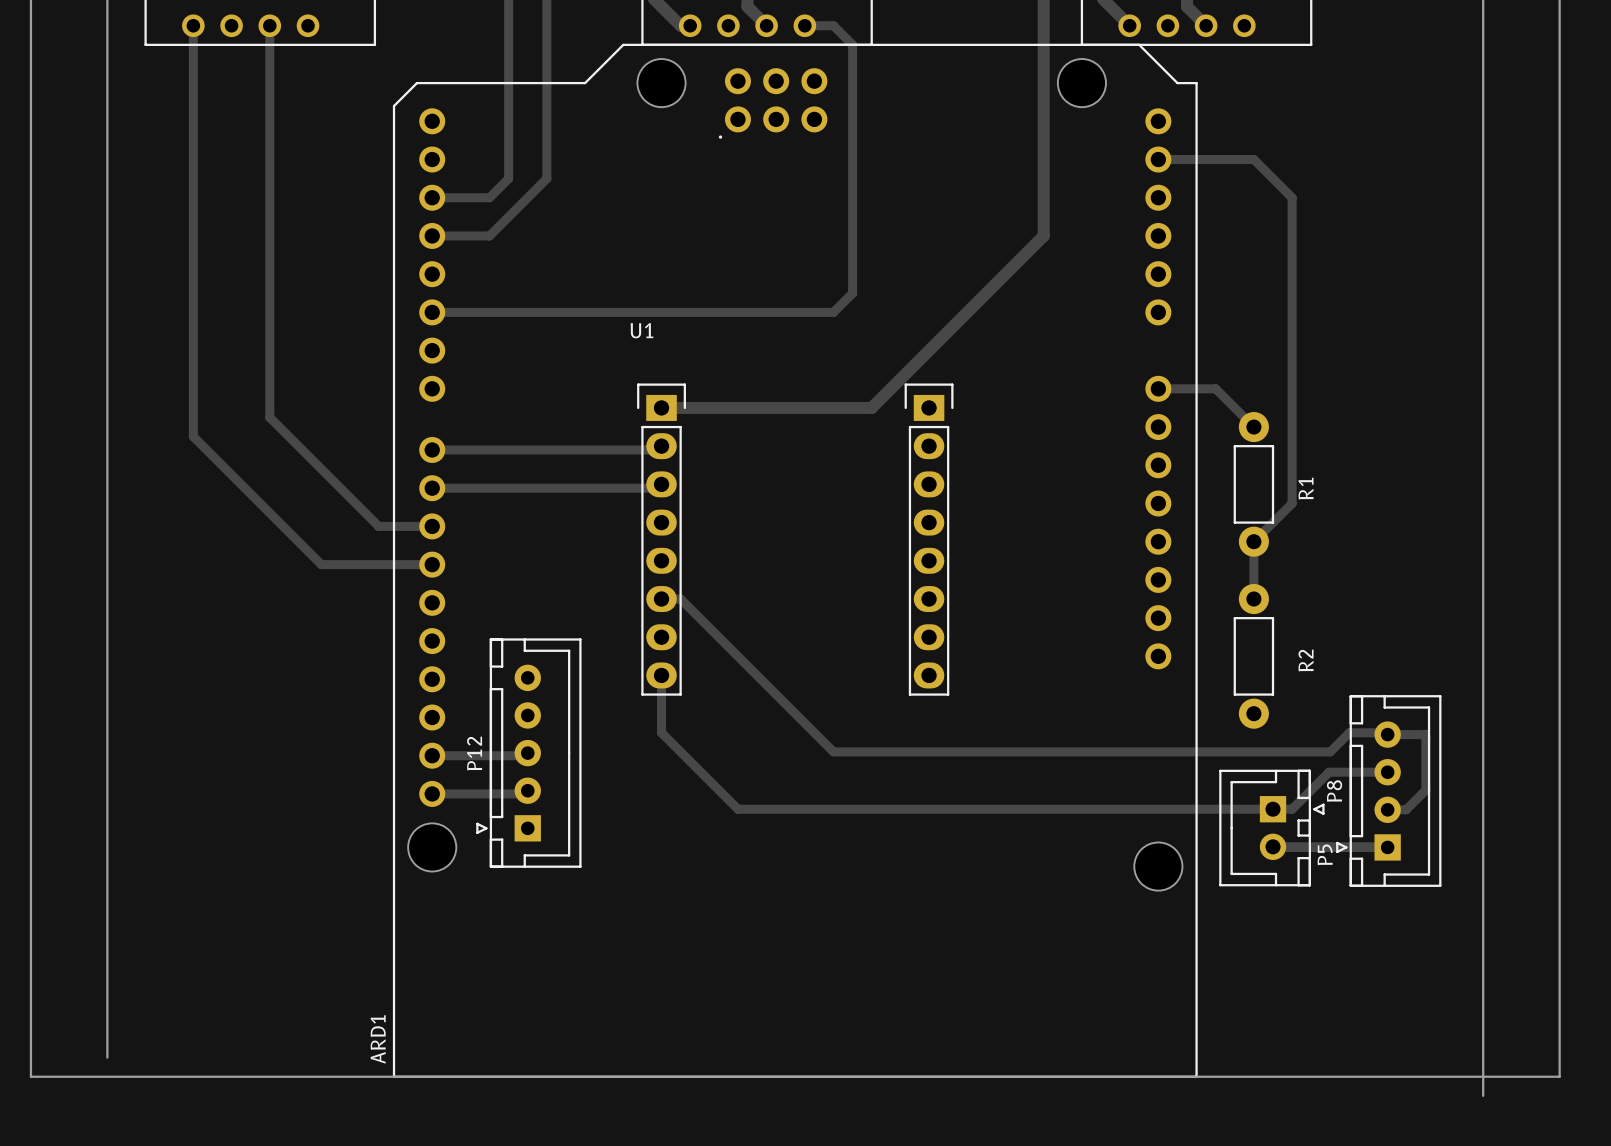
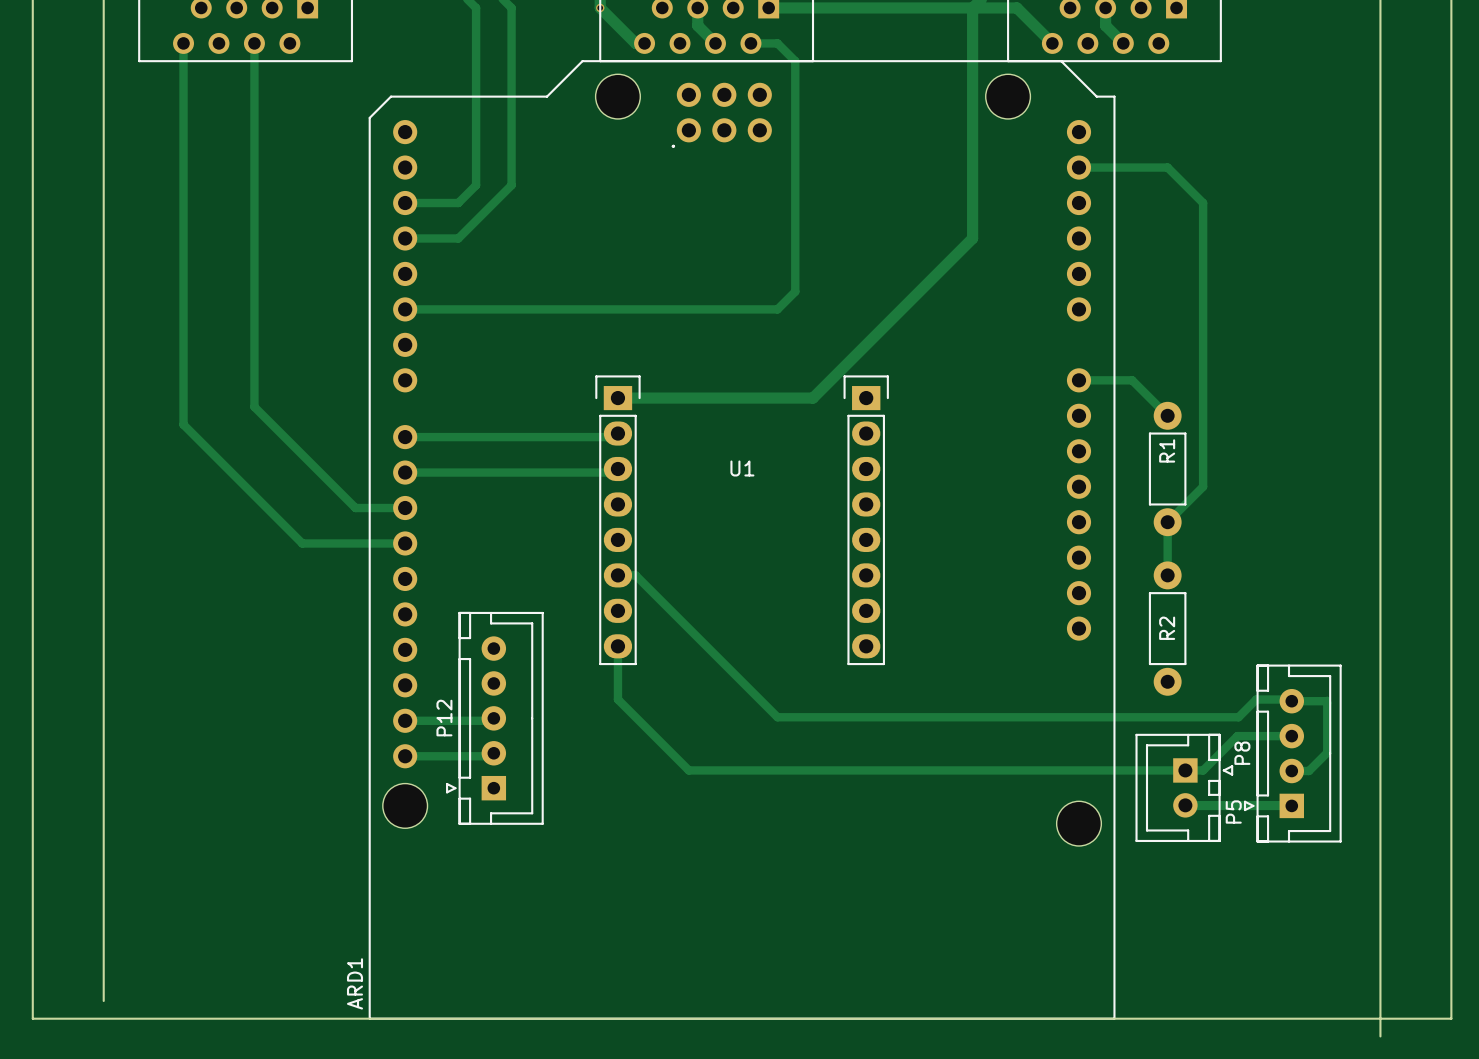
U1 name position: U1 (641, 330) -> U1 (742, 468)
R1 name position: R1 (1306, 488) -> R1 (1167, 450)
R2 name position: R2 (1306, 660) -> R2 (1167, 628)

